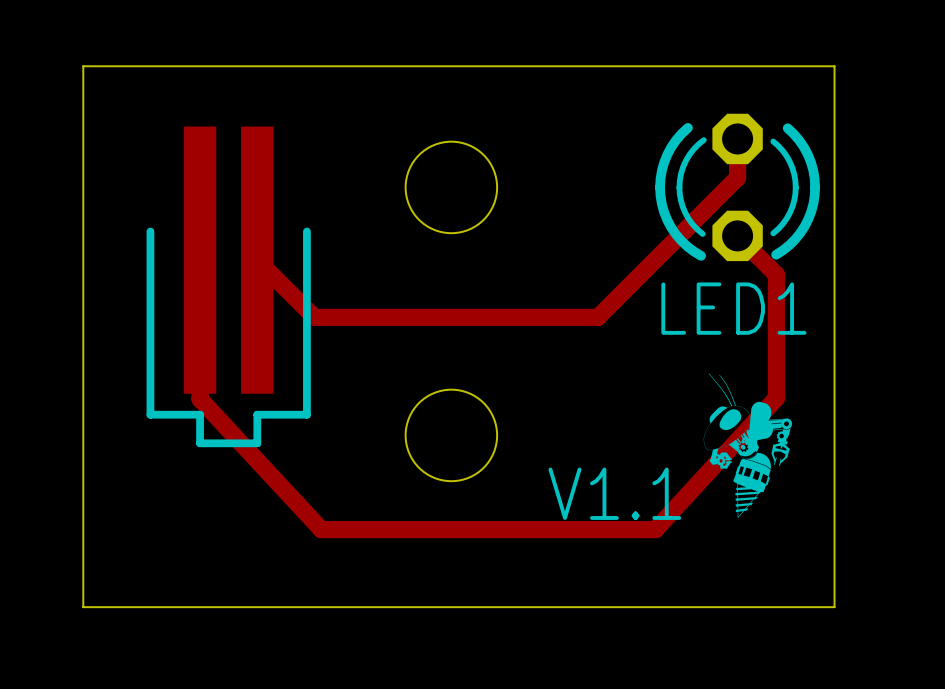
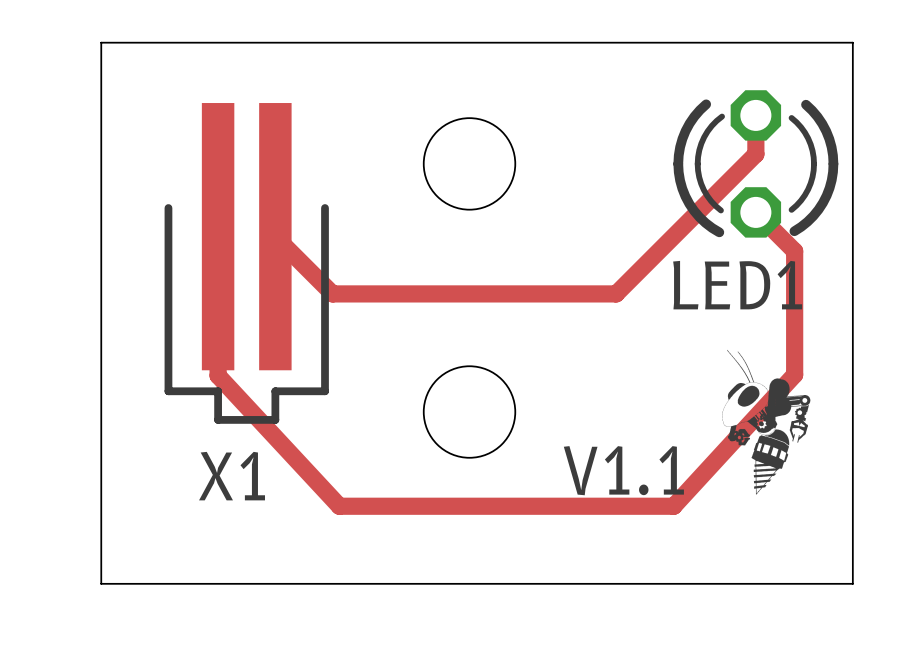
X1: none -> (232, 476)

